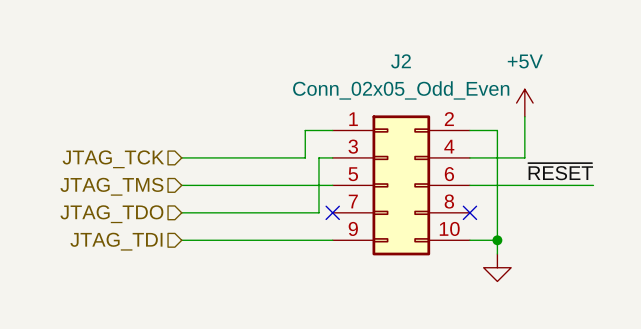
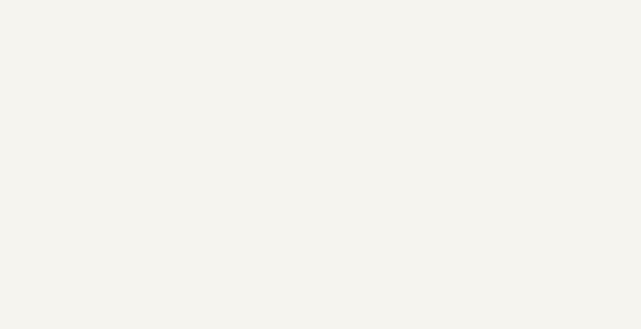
power symbol: +5V (524, 103) -> none
wire: (524, 116) (524, 157) (469, 157) -> none
wire: (332, 130) (305, 130) (305, 157) (181, 157) -> none
wire: (469, 130) (497, 130) (497, 254) -> none
wire: (332, 157) (318, 157) (318, 212) (181, 212) -> none
hierarchical label: JTAG_TCK (113, 159) -> none
label: ~{RESET} (560, 171) -> none
wire: (181, 185) (332, 185) -> none
J2: Conn_02x05_Odd_Even (401, 185) -> none
wire: (469, 185) (593, 185) -> none
hierarchical label: JTAG_TMS (111, 186) -> none
no-connect mark: (332, 212) -> none
no-connect mark: (469, 212) -> none
hierarchical label: JTAG_TDO (111, 214) -> none
wire: (181, 240) (332, 240) -> none
wire: (469, 240) (497, 240) -> none
junction: (497, 240) -> none
hierarchical label: JTAG_TDI (116, 241) -> none
power symbol: (497, 267) -> none

